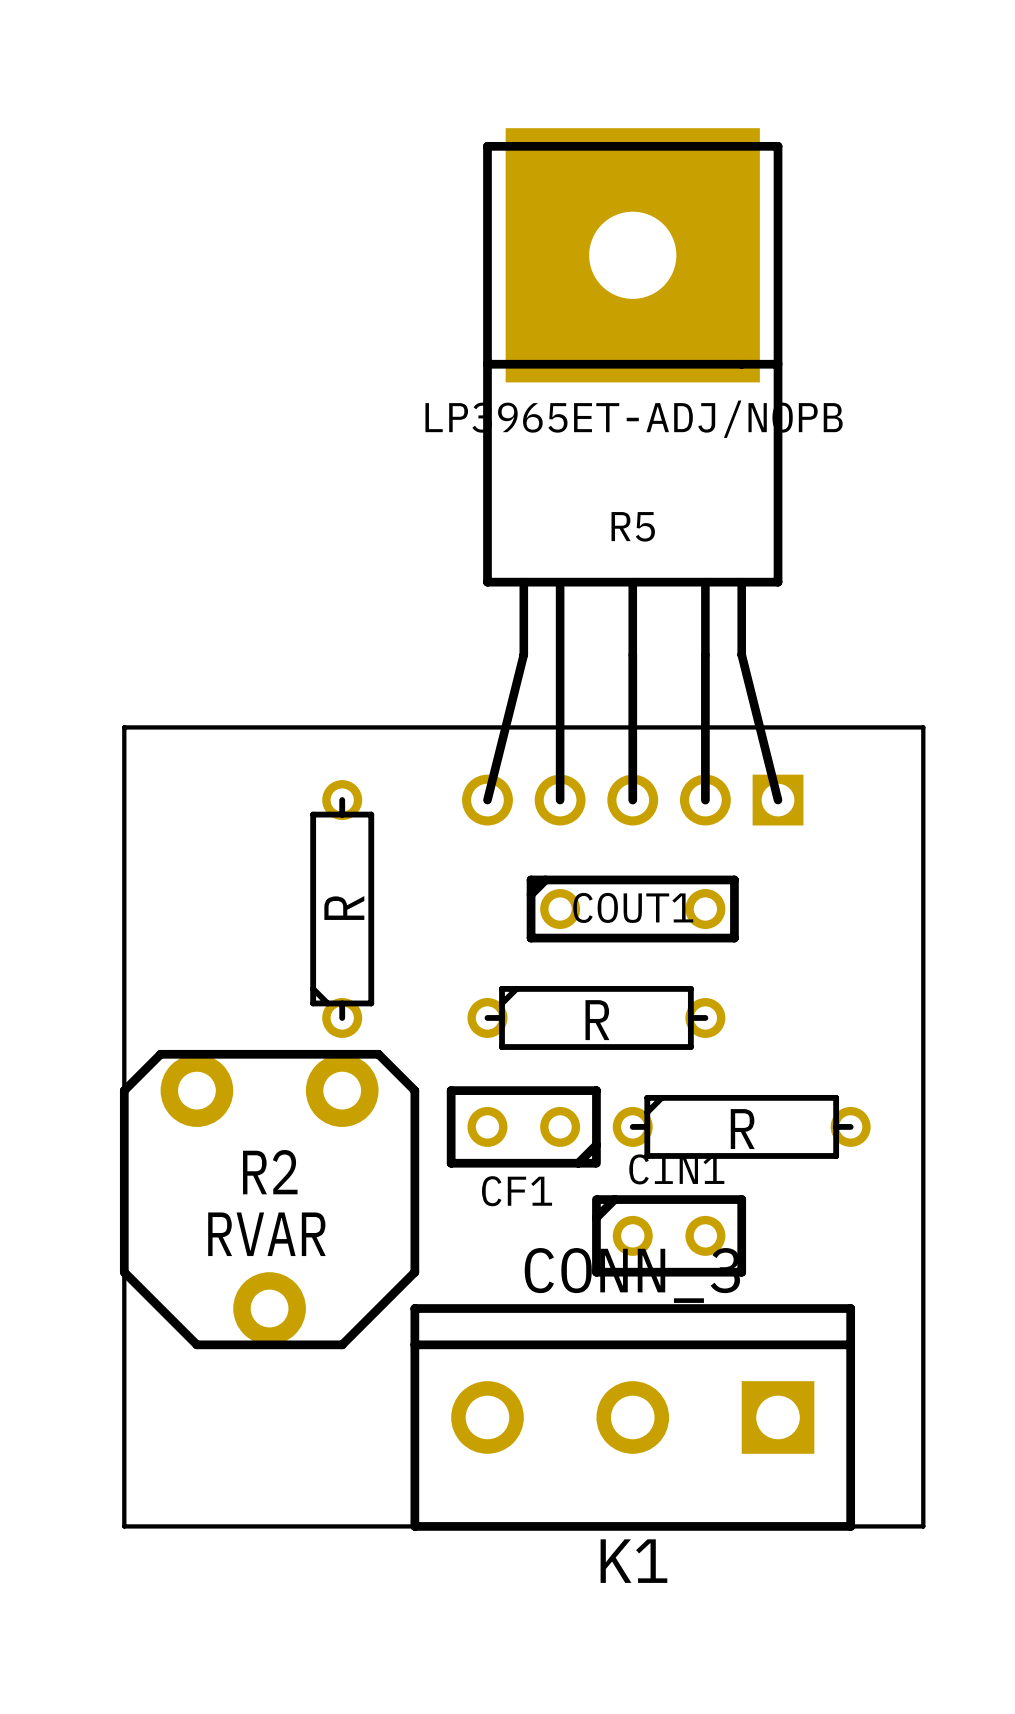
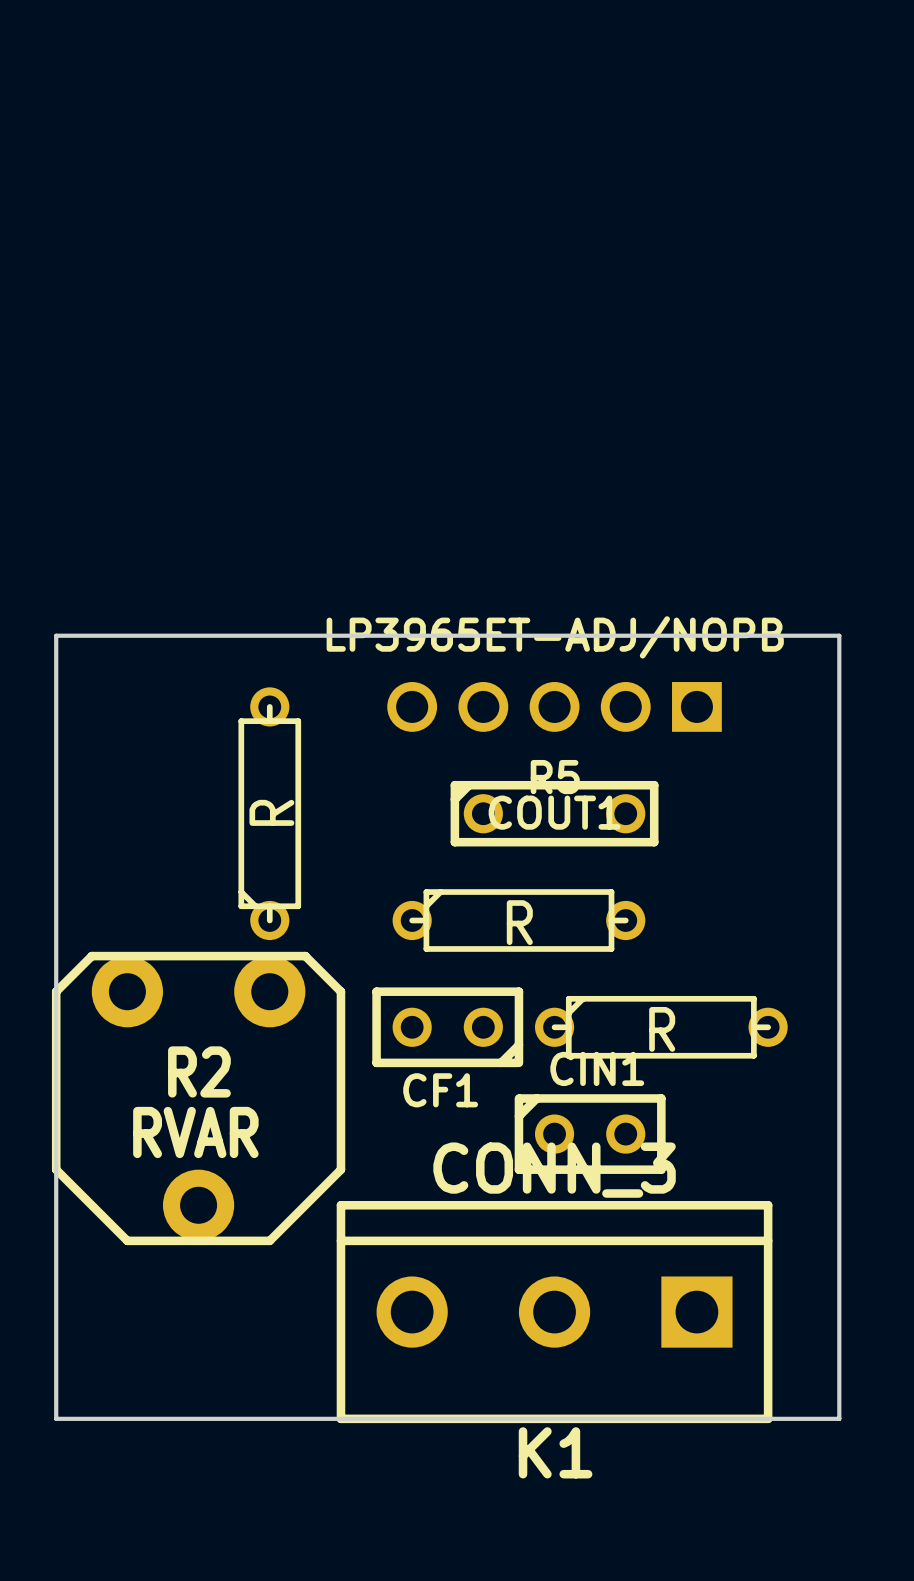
R5 footprint: [462, 128, 804, 826] -> [387, 682, 722, 732]

